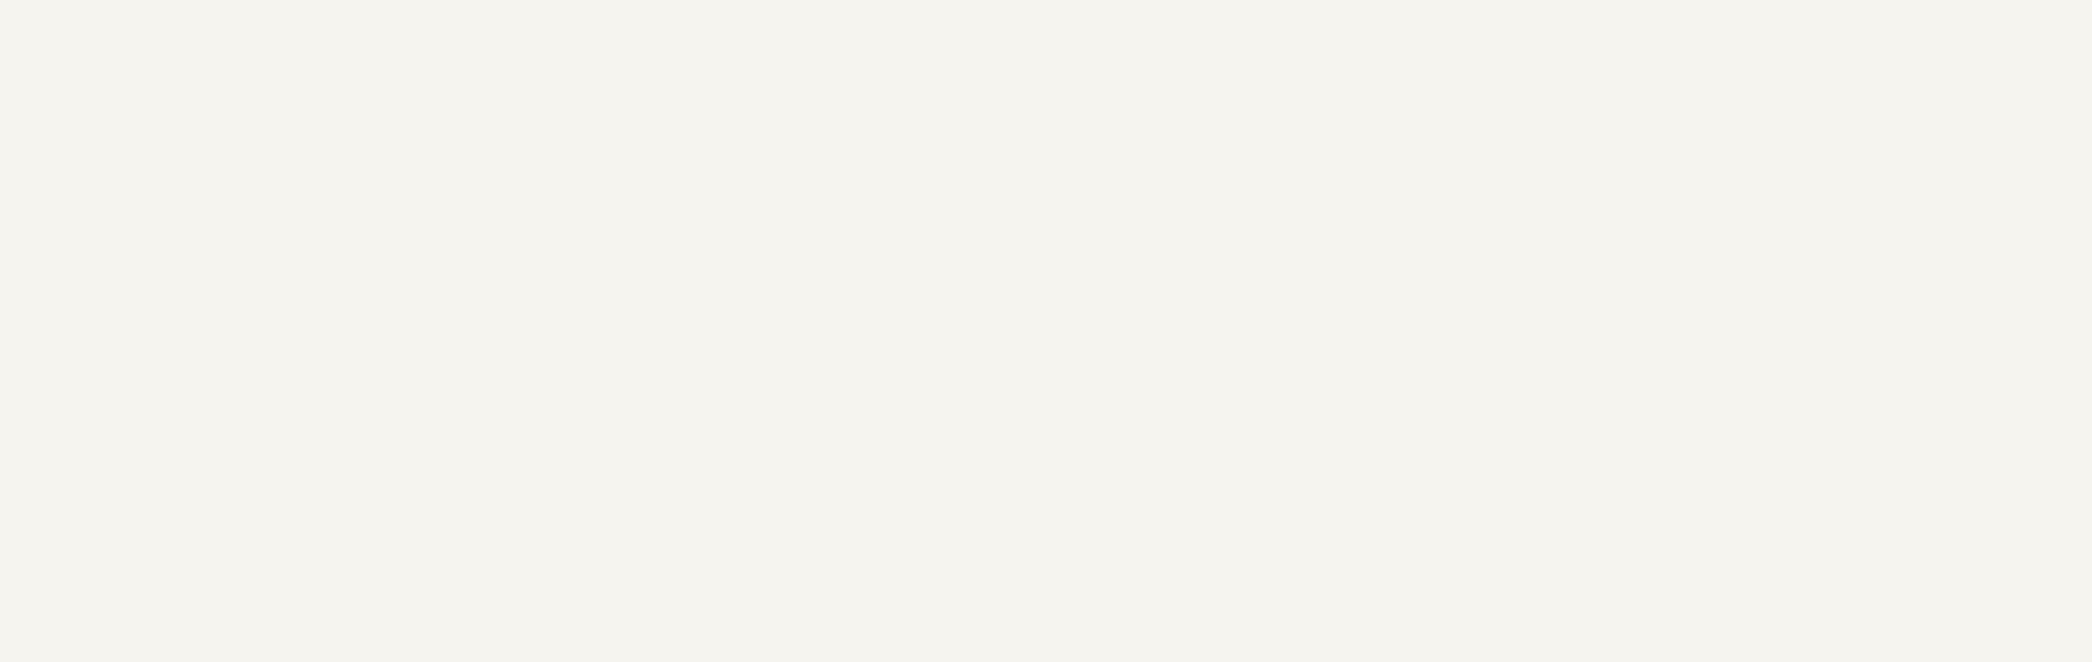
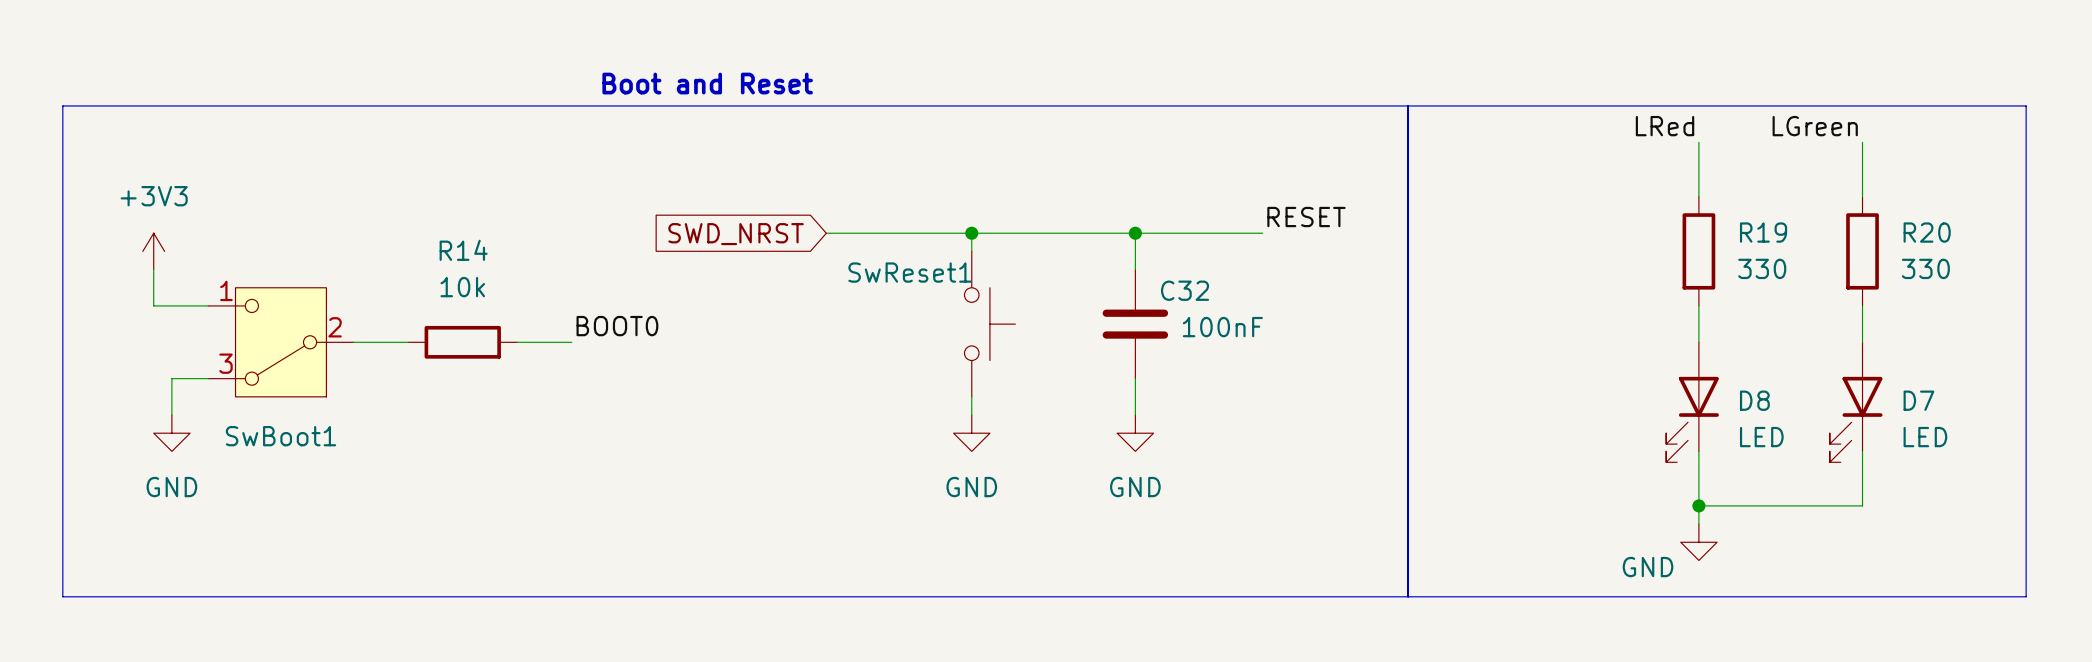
text: none -> Boot and Reset (707, 83)
line: none -> (62, 105) (2026, 105) (2026, 596) (62, 596) (62, 105)
line: none -> (1408, 105) (1408, 596)
label: none -> LRed (1665, 126)
label: none -> LGreen (1815, 126)
wire: none -> (1698, 142) (1698, 196)
wire: none -> (1862, 142) (1862, 196)
label: none -> RESET (1306, 217)
wire: none -> (826, 233) (1262, 233)
wire: none -> (971, 233) (971, 251)
junction: none -> (971, 233)
wire: none -> (1135, 233) (1135, 269)
junction: none -> (1135, 233)
global label: none -> SWD_NRST (736, 234)
power symbol: none -> +3V3 (153, 251)
R19: none -> 330 (1698, 251)
R20: none -> 330 (1862, 251)
wire: none -> (153, 269) (153, 305) (208, 305)
wire: none -> (1698, 305) (1698, 342)
wire: none -> (1862, 305) (1862, 342)
SwReset1: none -> (989, 324)
C32: none -> 100nF (1135, 324)
label: none -> BOOT0 (617, 326)
SwBoot1: none -> (280, 342)
wire: none -> (353, 342) (408, 342)
R14: none -> 10k (462, 342)
wire: none -> (517, 342) (571, 342)
wire: none -> (208, 378) (171, 378) (171, 415)
wire: none -> (1135, 378) (1135, 415)
wire: none -> (971, 396) (971, 415)
D8: none -> LED (1692, 402)
D7: none -> LED (1856, 402)
power symbol: none -> GND (171, 433)
power symbol: none -> GND (971, 433)
power symbol: none -> GND (1135, 433)
wire: none -> (1698, 451) (1698, 524)
wire: none -> (1862, 451) (1862, 505) (1698, 505)
junction: none -> (1698, 505)
power symbol: none -> GND (1698, 542)

